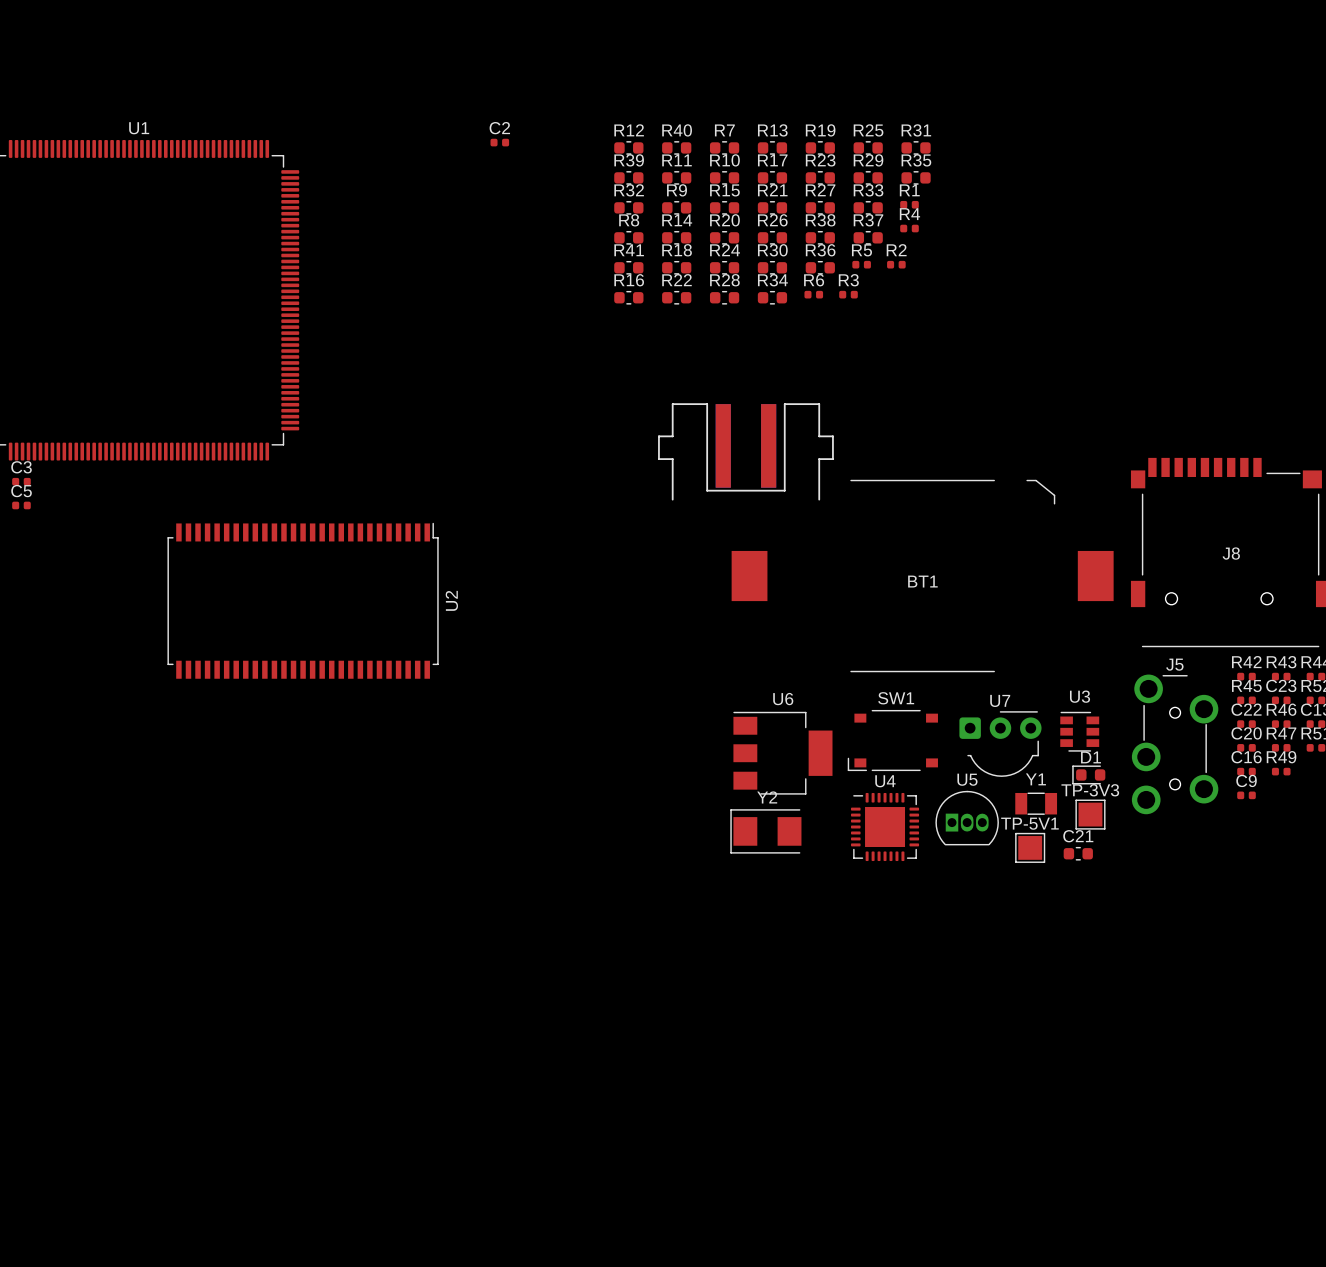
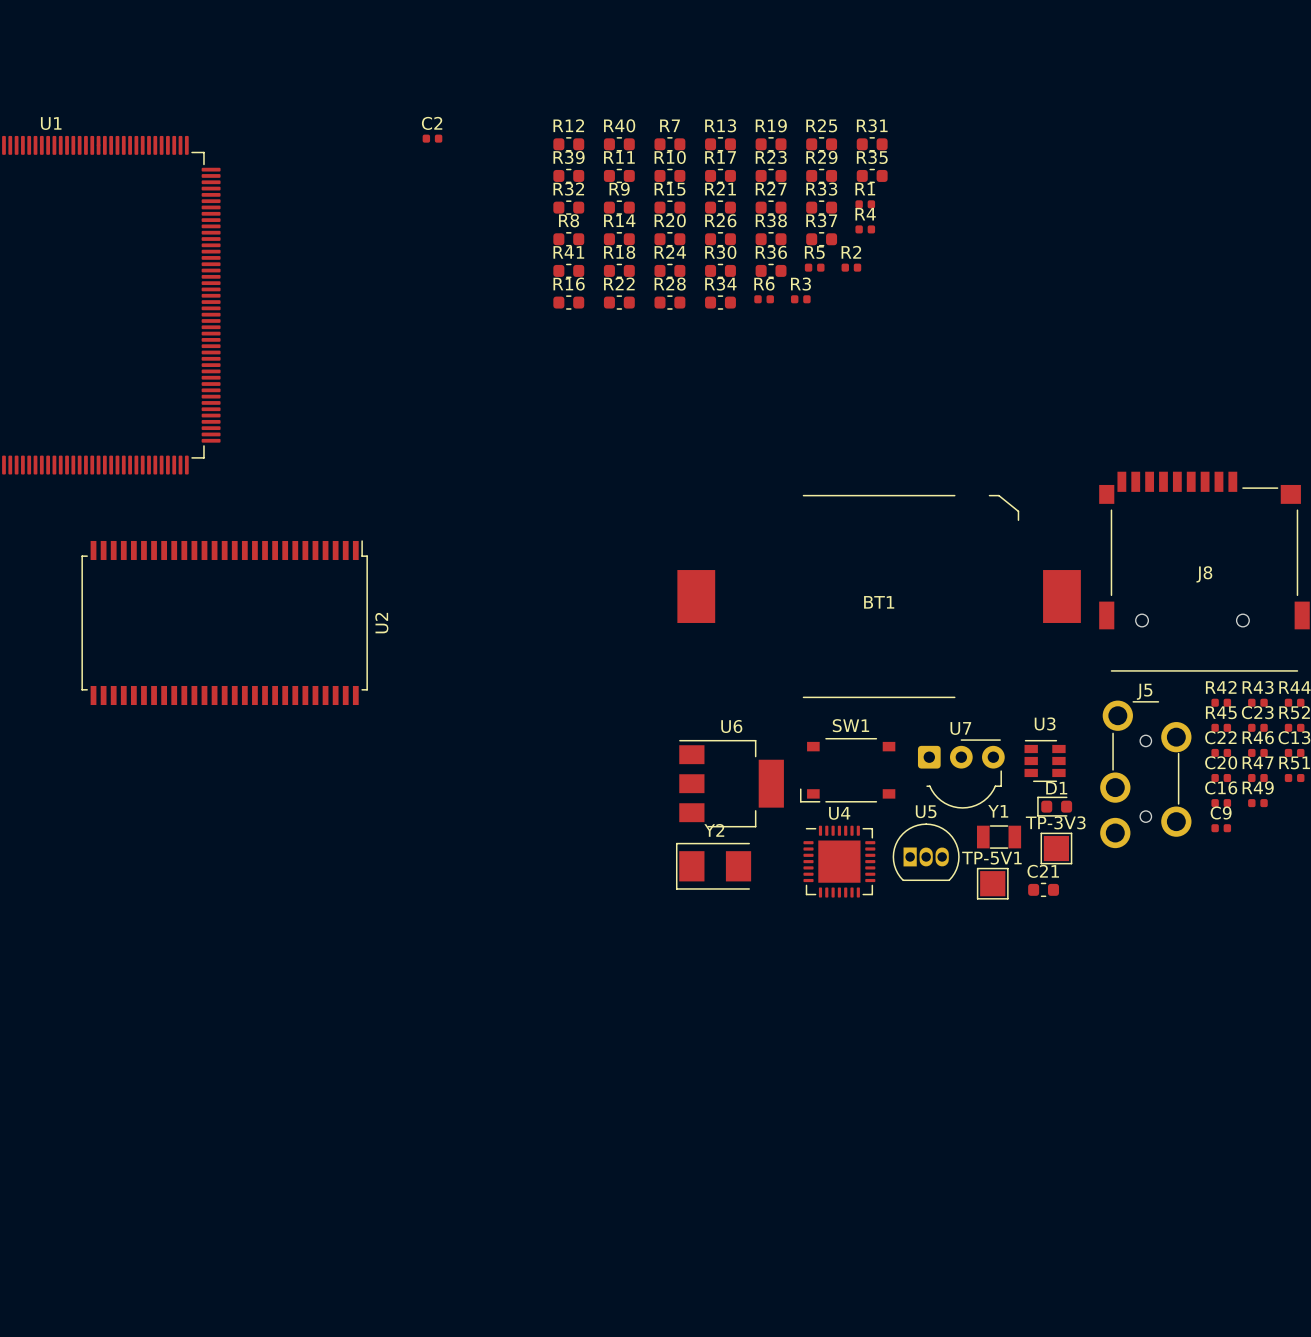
part: (745, 451) -> none

